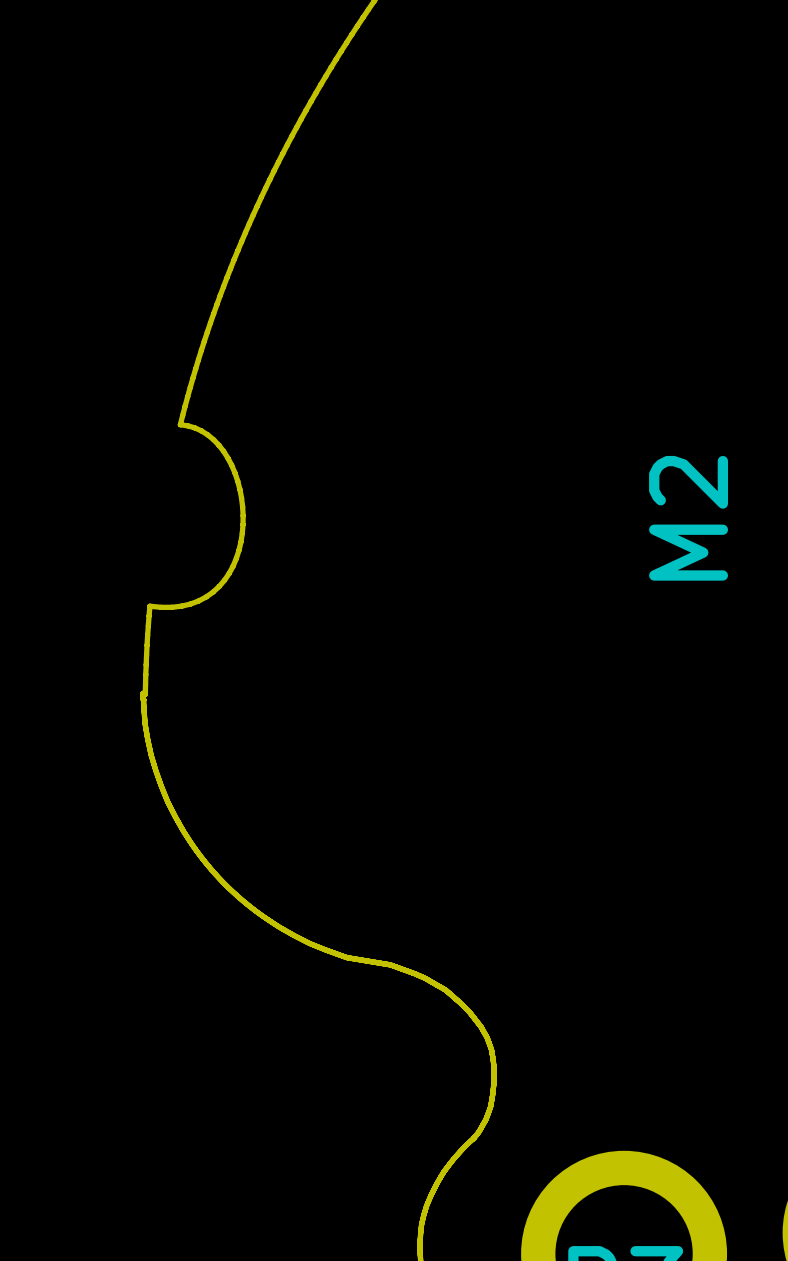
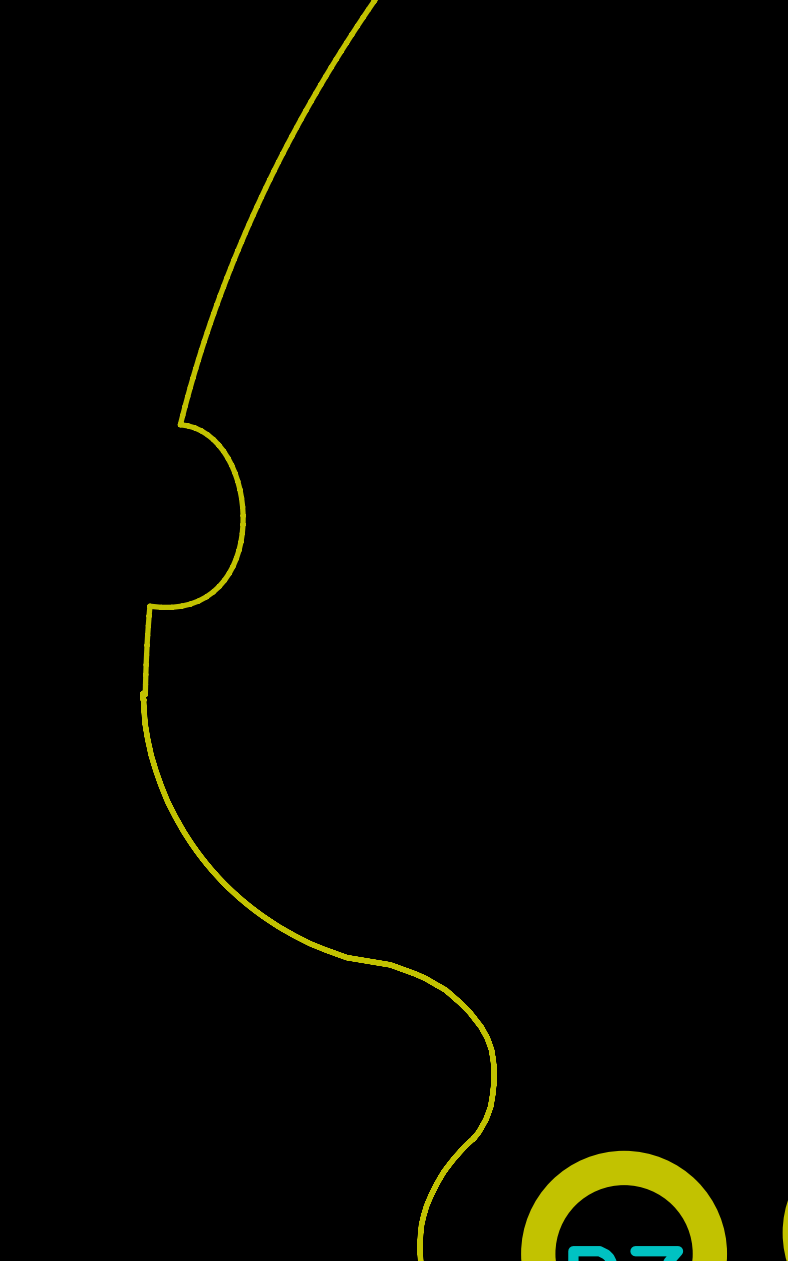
M2 name: M2 (688, 518) -> none

